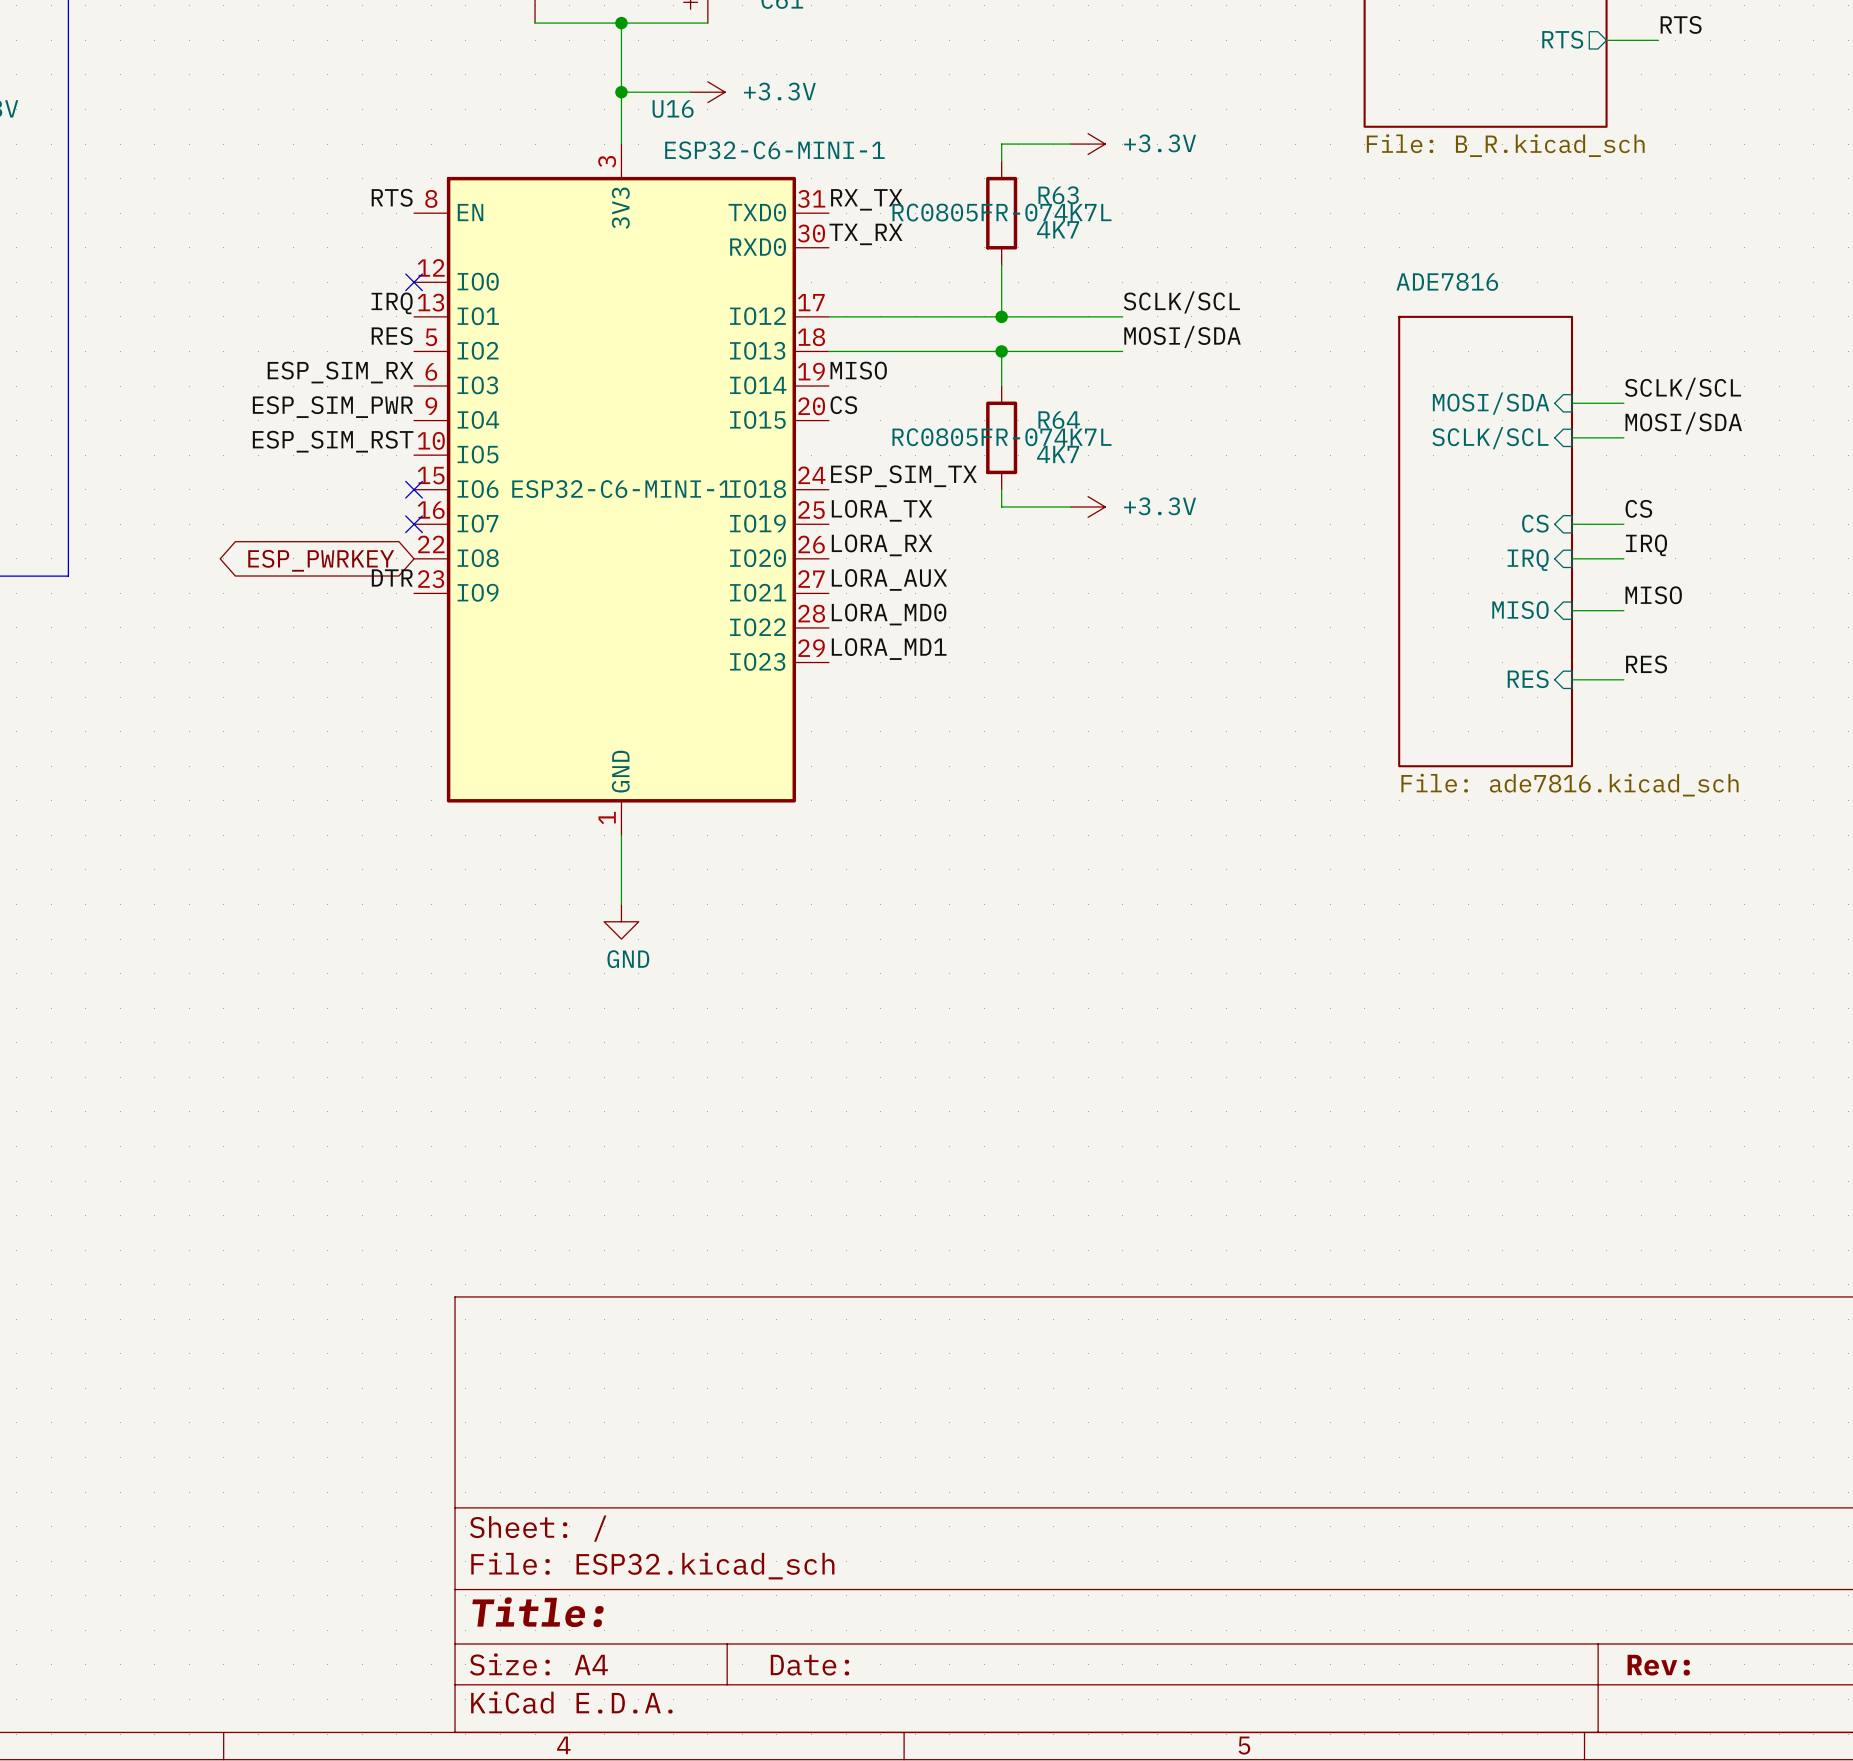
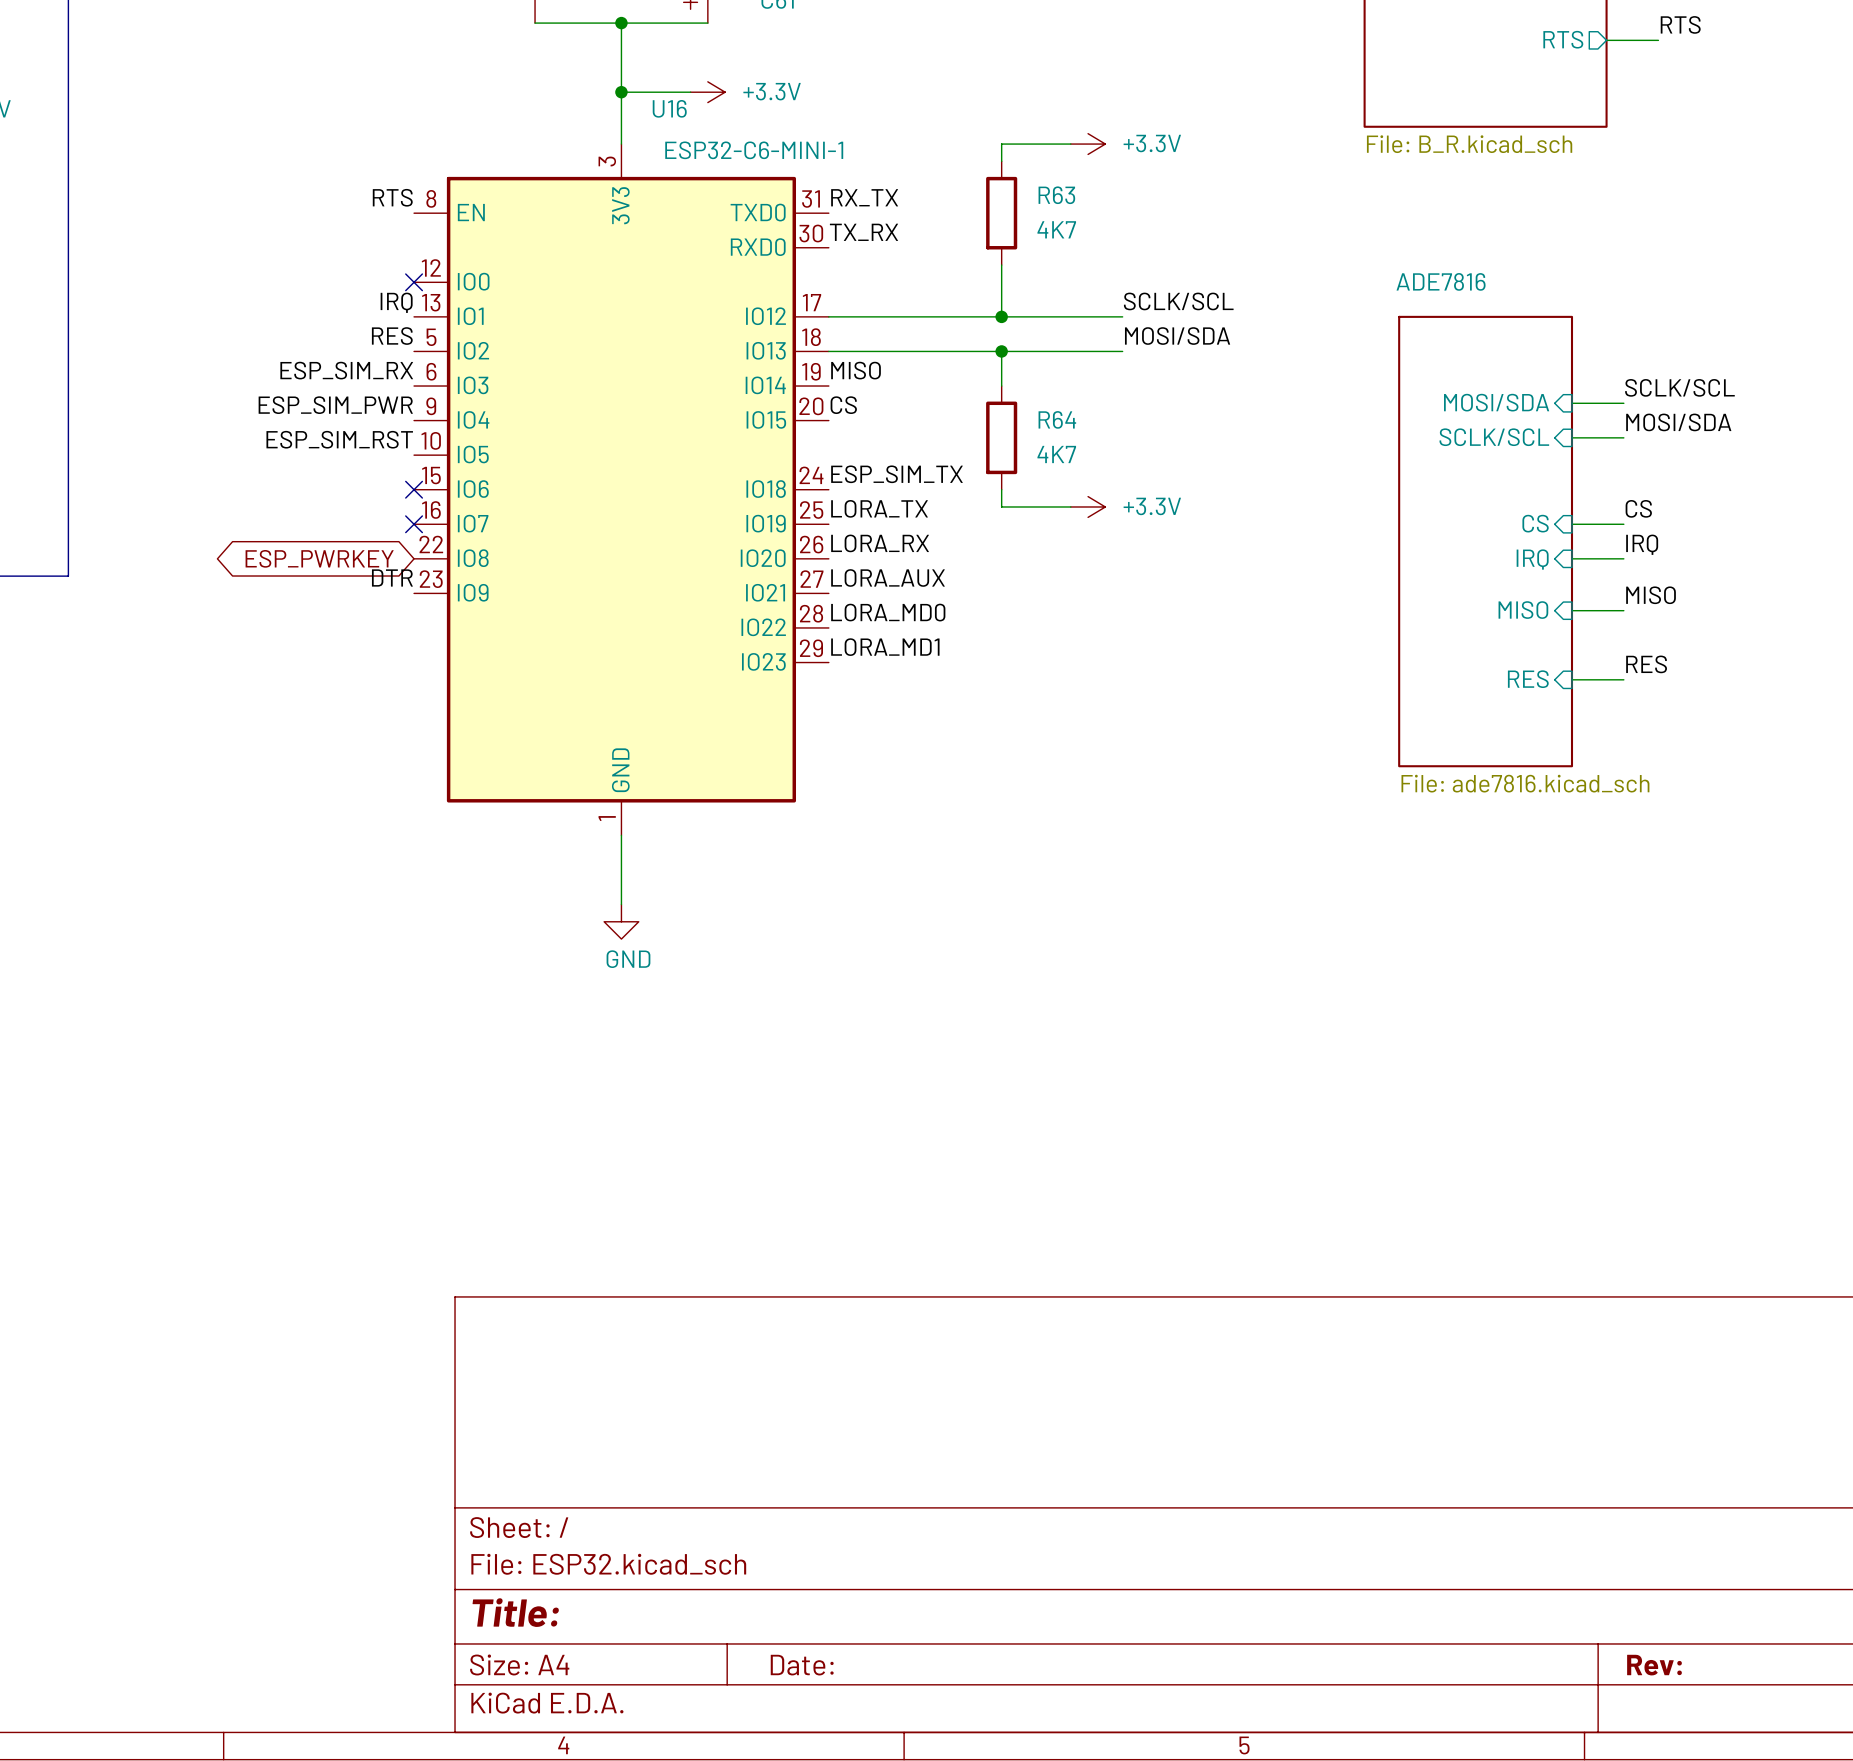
R63 text: RC0805FR-074K7L (1001, 212) -> none
R64 text: RC0805FR-074K7L (1001, 437) -> none
U16 text: ESP32-C6-MINI-1 (621, 489) -> none

